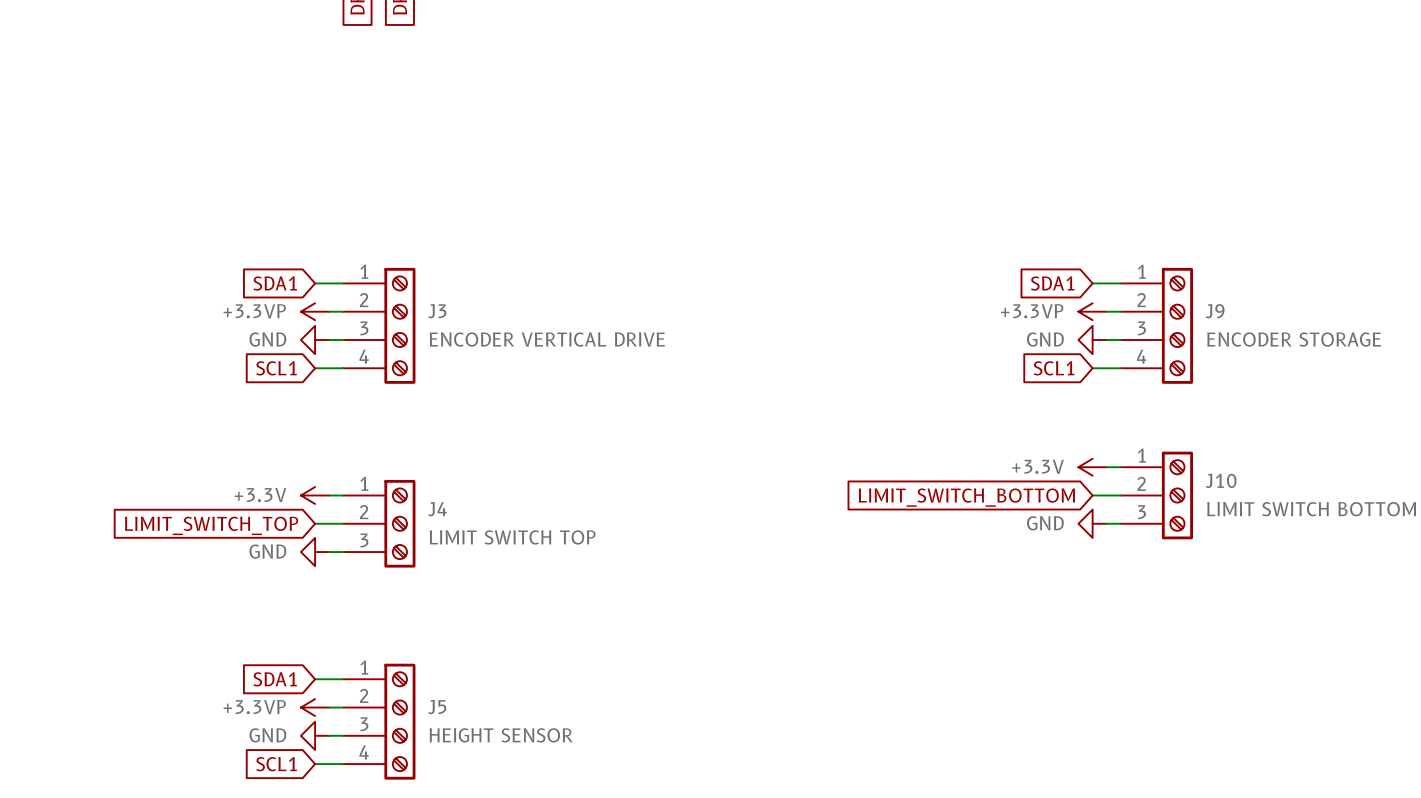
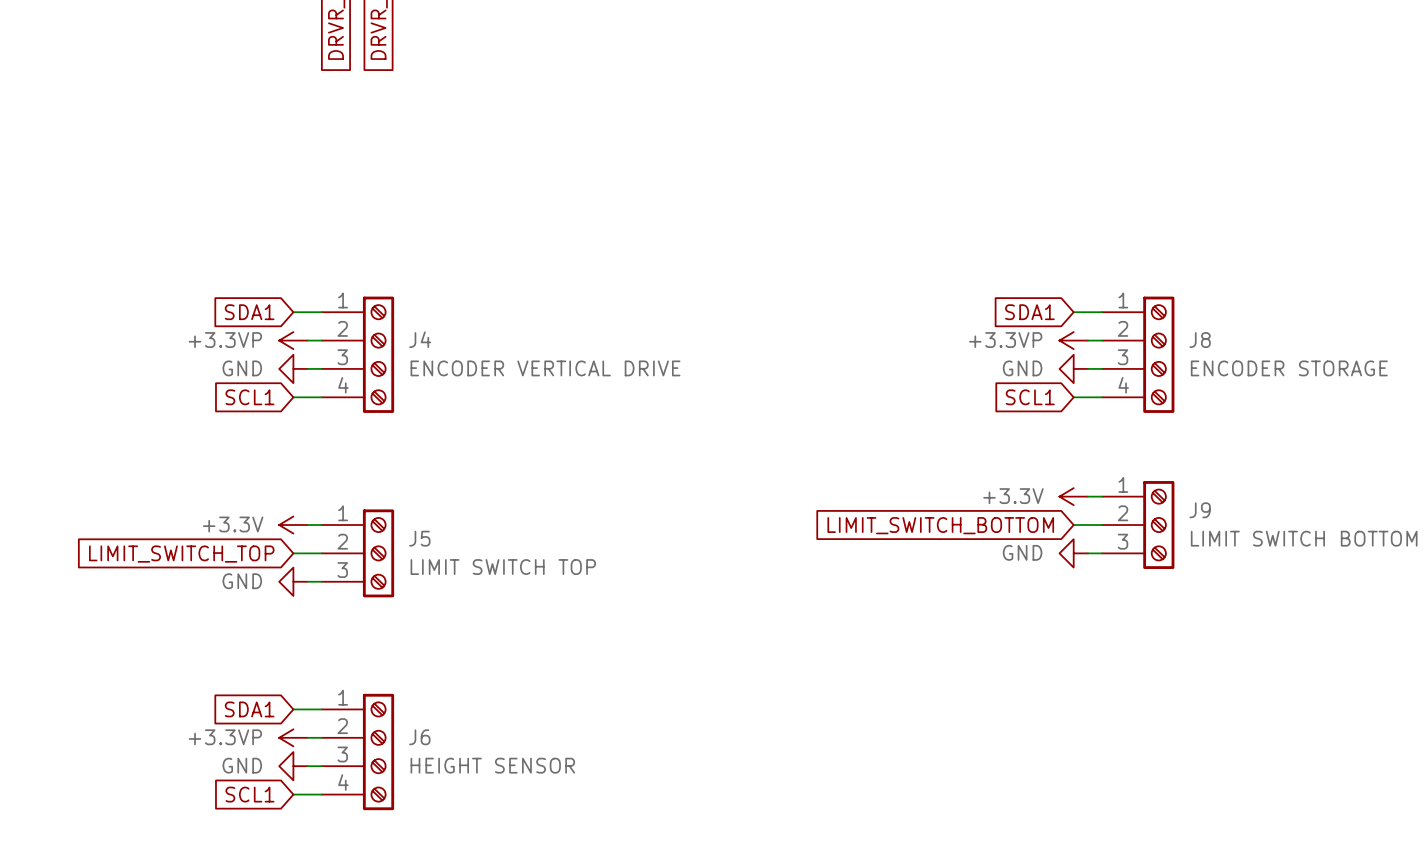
J3 name: J3 (437, 311) -> J4 (420, 339)
J9 name: J9 (1215, 311) -> J8 (1200, 340)
J10 name: J10 (1221, 480) -> J9 (1200, 510)
J4 name: J4 (437, 509) -> J5 (419, 538)
J5 name: J5 (437, 707) -> J6 (419, 737)

